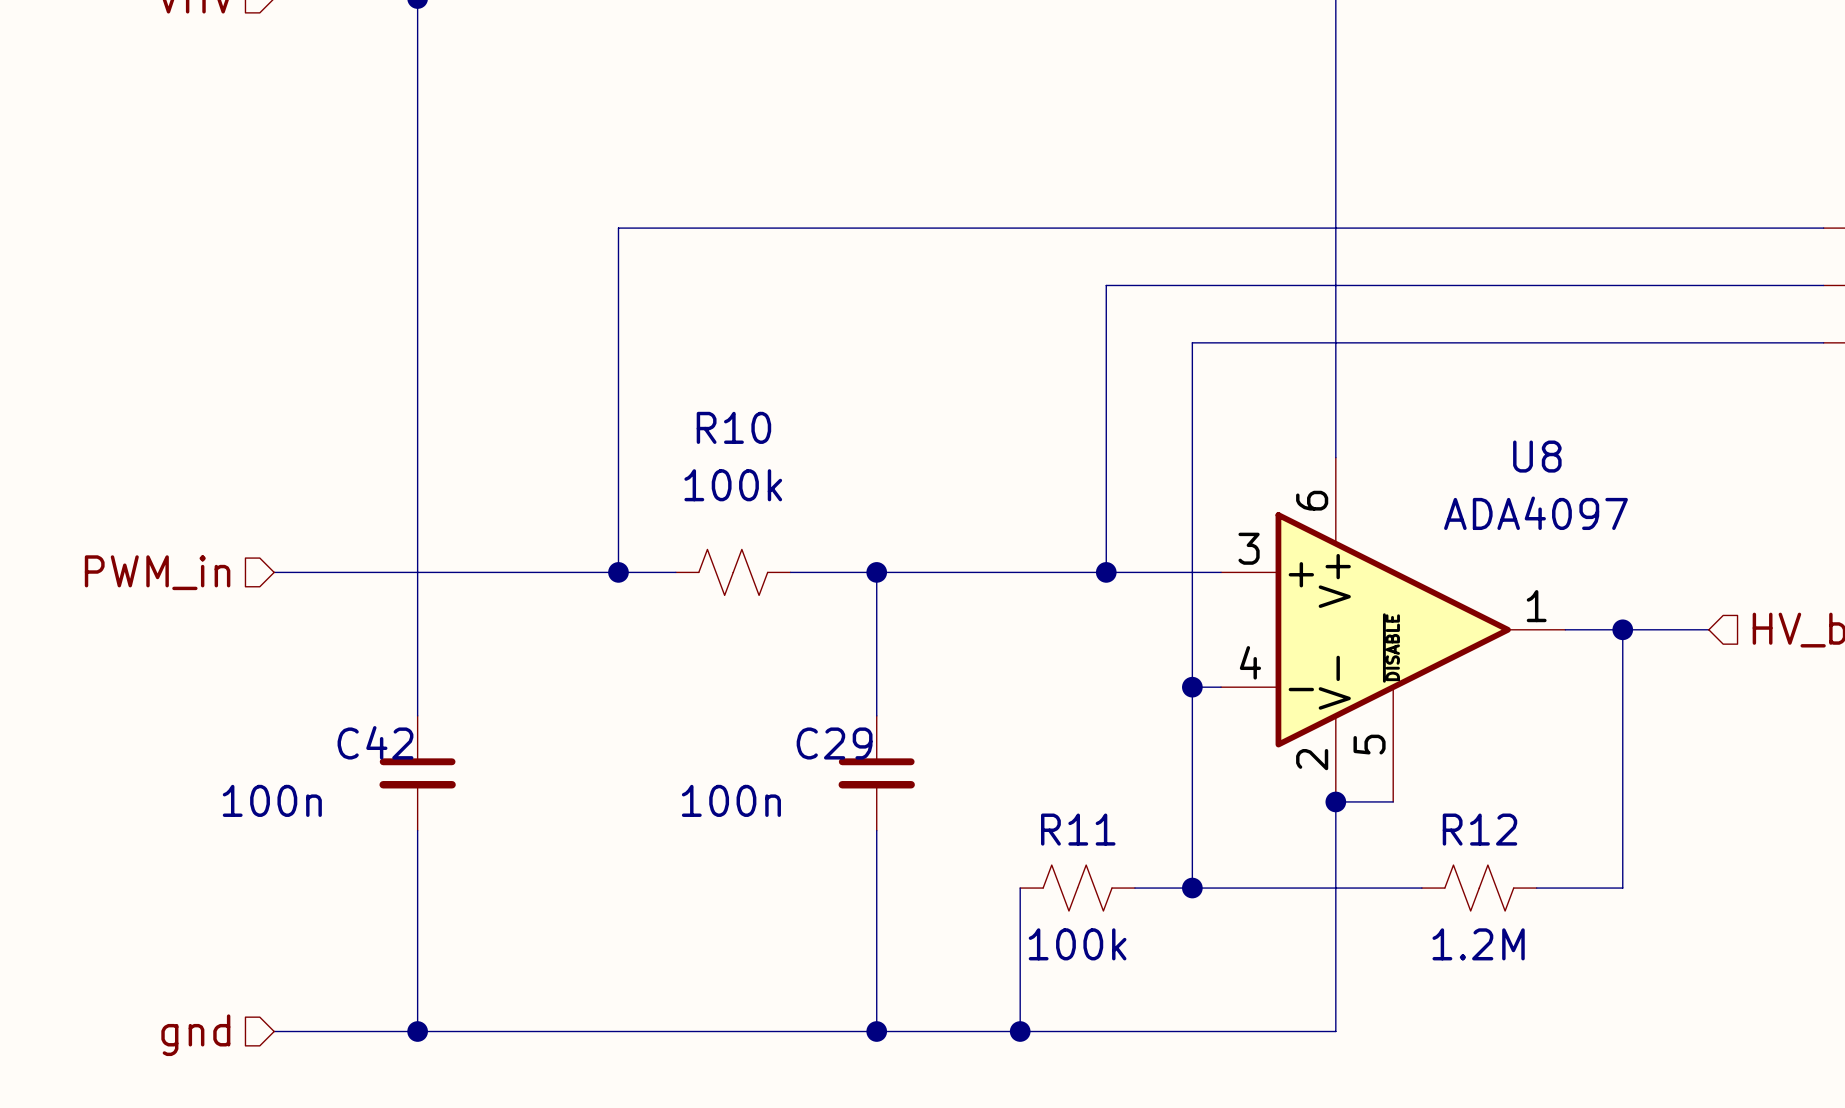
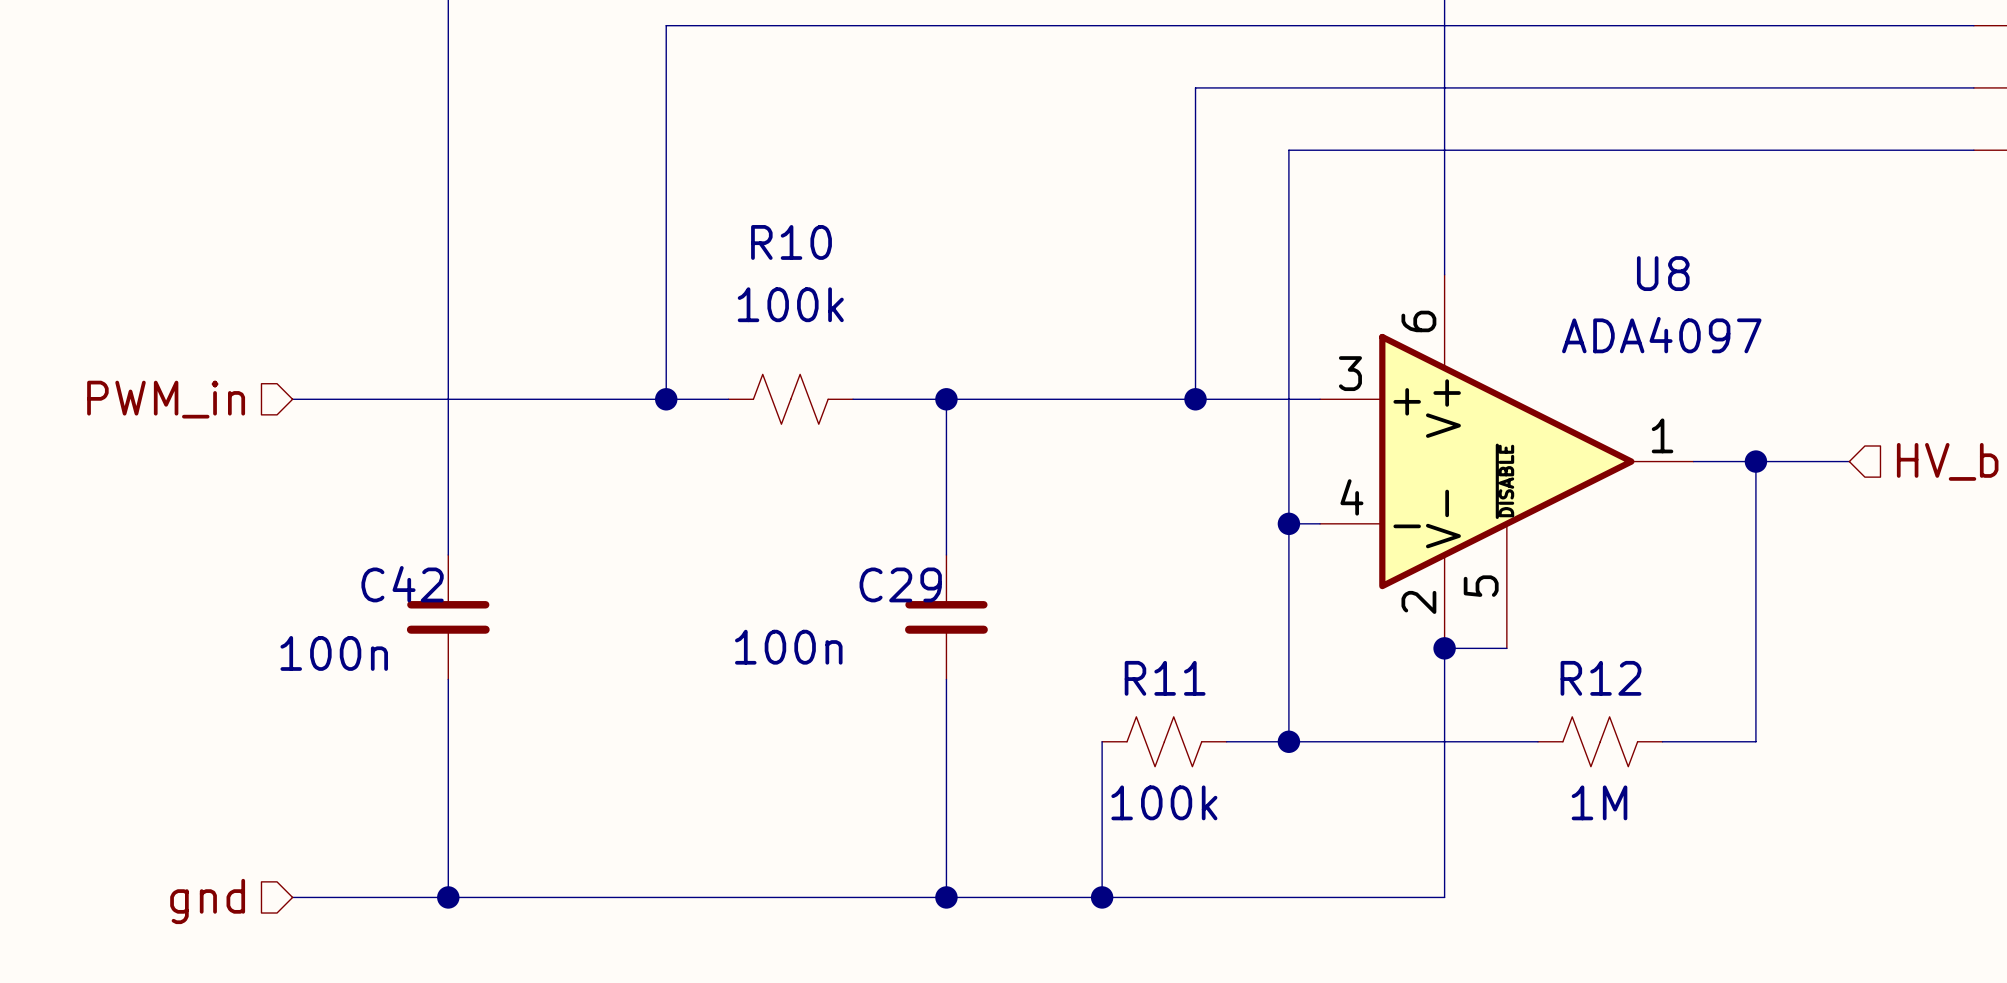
C42 value position: 100n (272, 800) -> 100n (334, 653)
R12 value: 1.2M (1478, 944) -> 1M (1599, 802)

